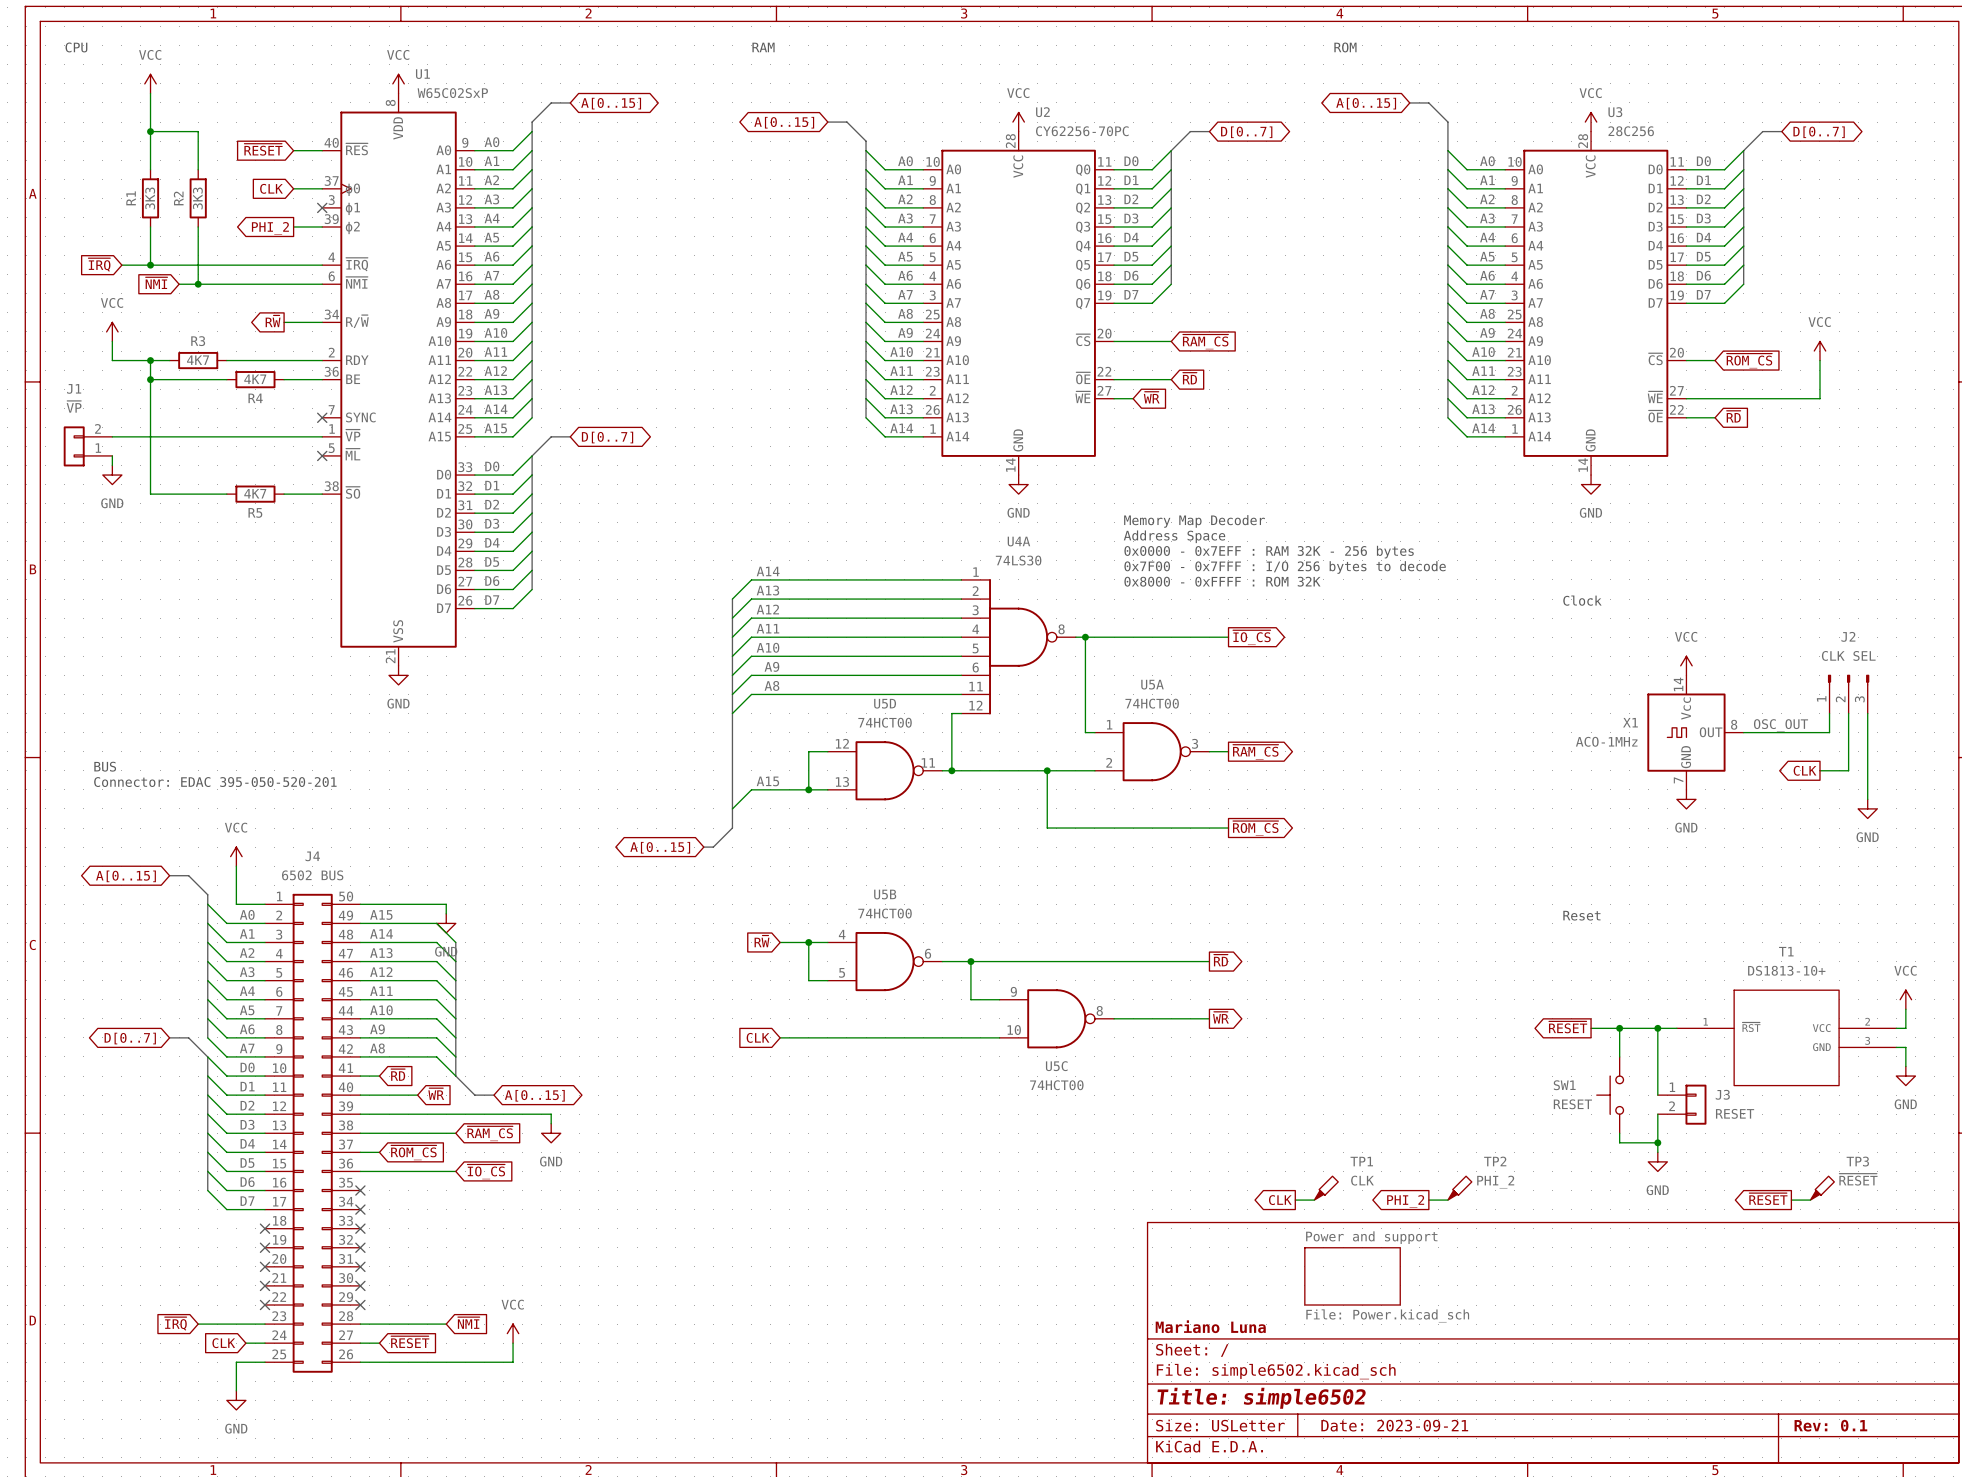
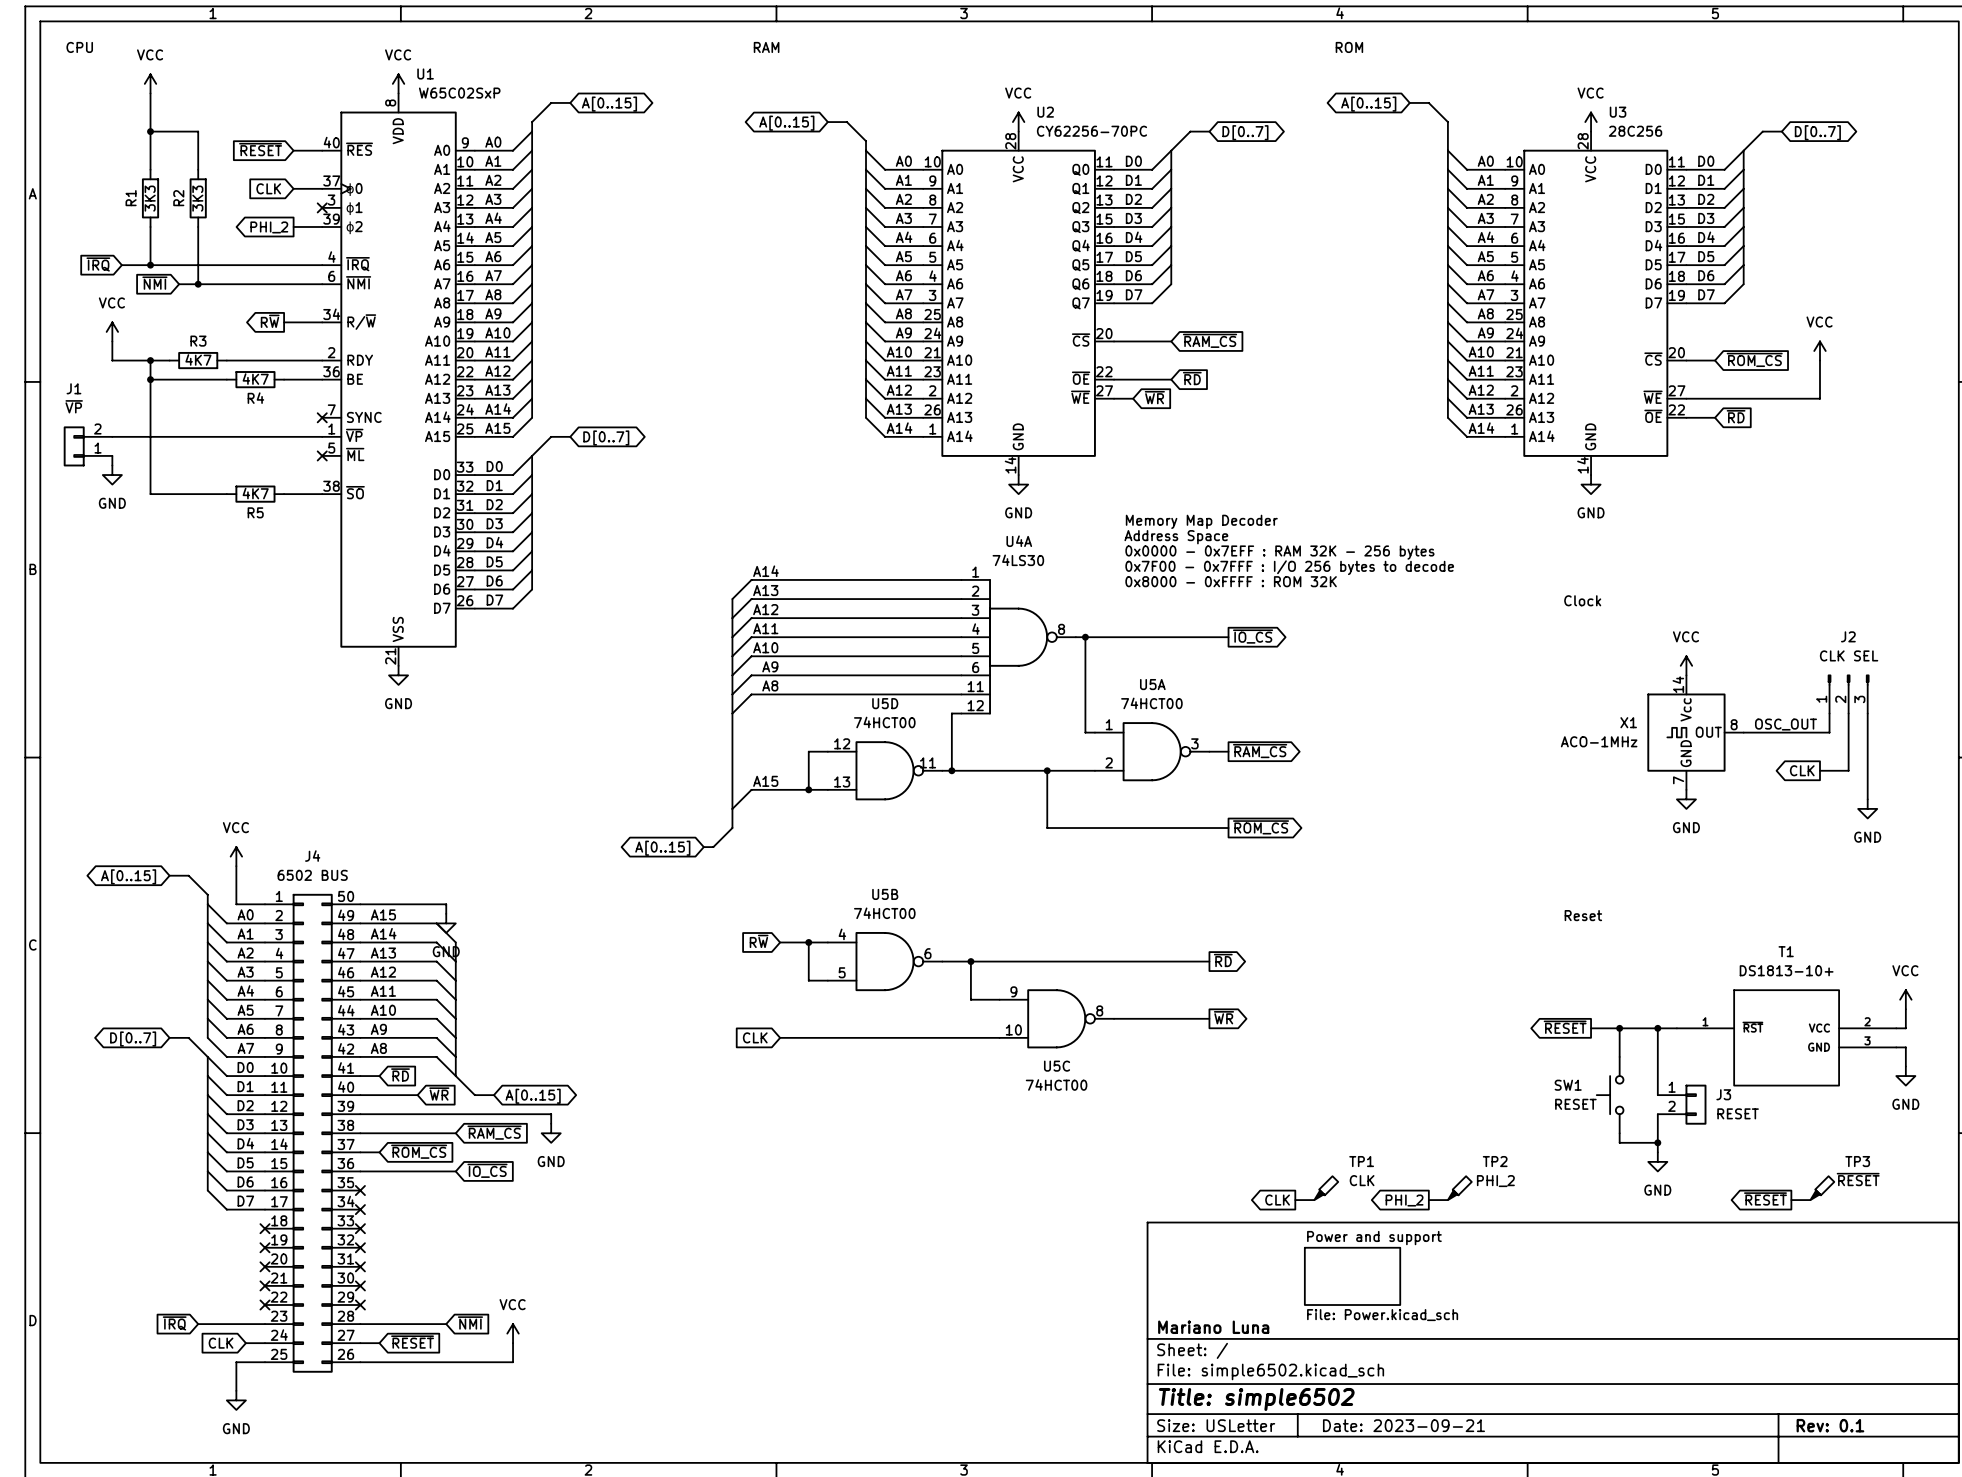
text: BUS (105, 766) -> none
text: Connector: EDAC 395-050-520-201 (215, 782) -> none

